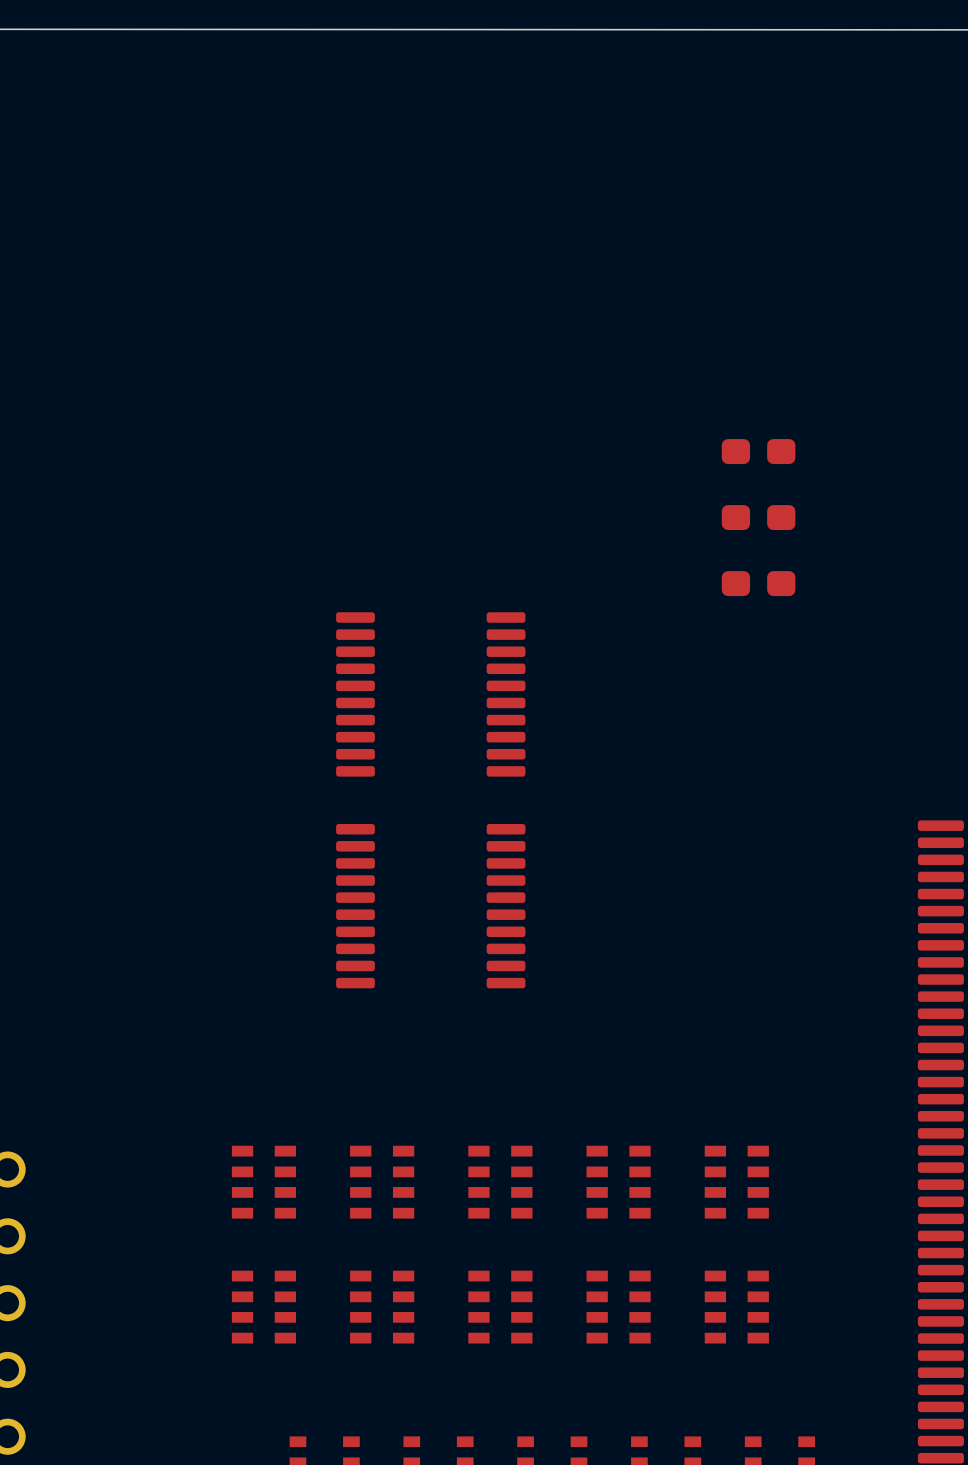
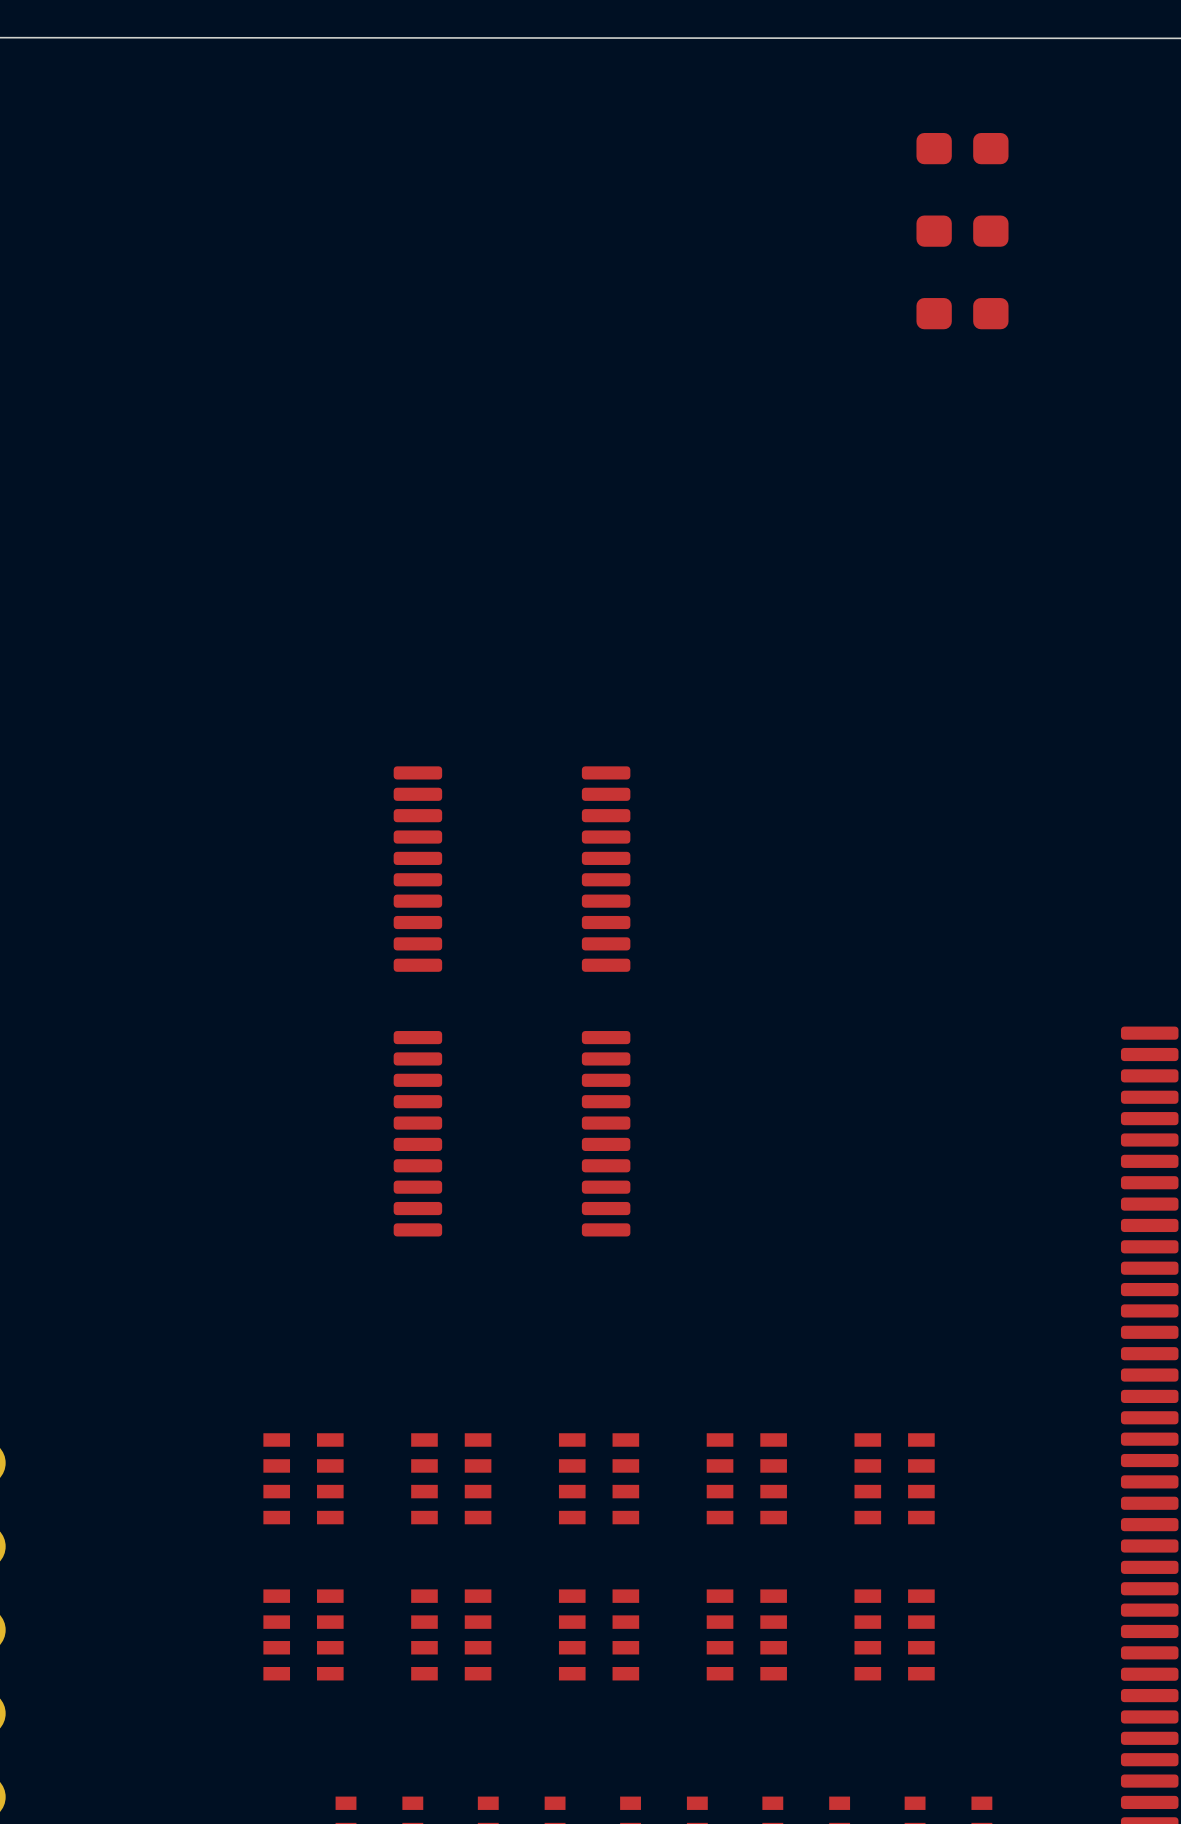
part: none -> (962, 148)
part: none -> (962, 231)
part: none -> (962, 313)
part: (758, 451) -> none
part: (758, 517) -> none
part: (758, 583) -> none

